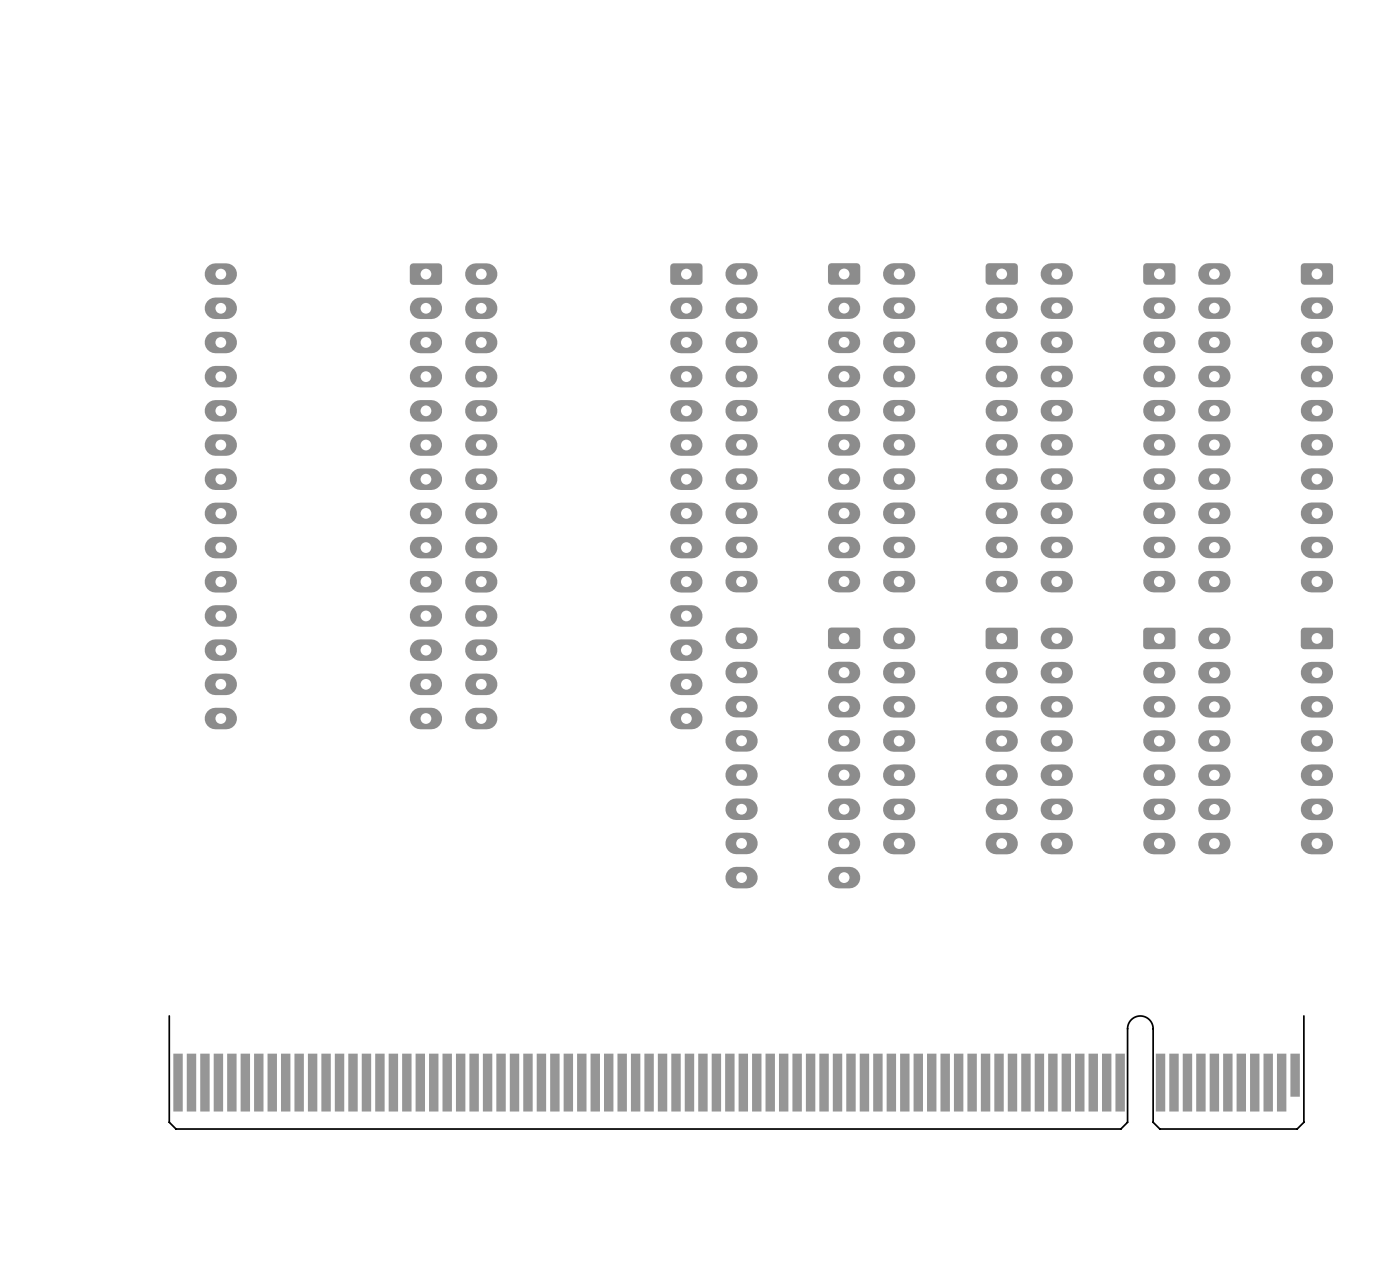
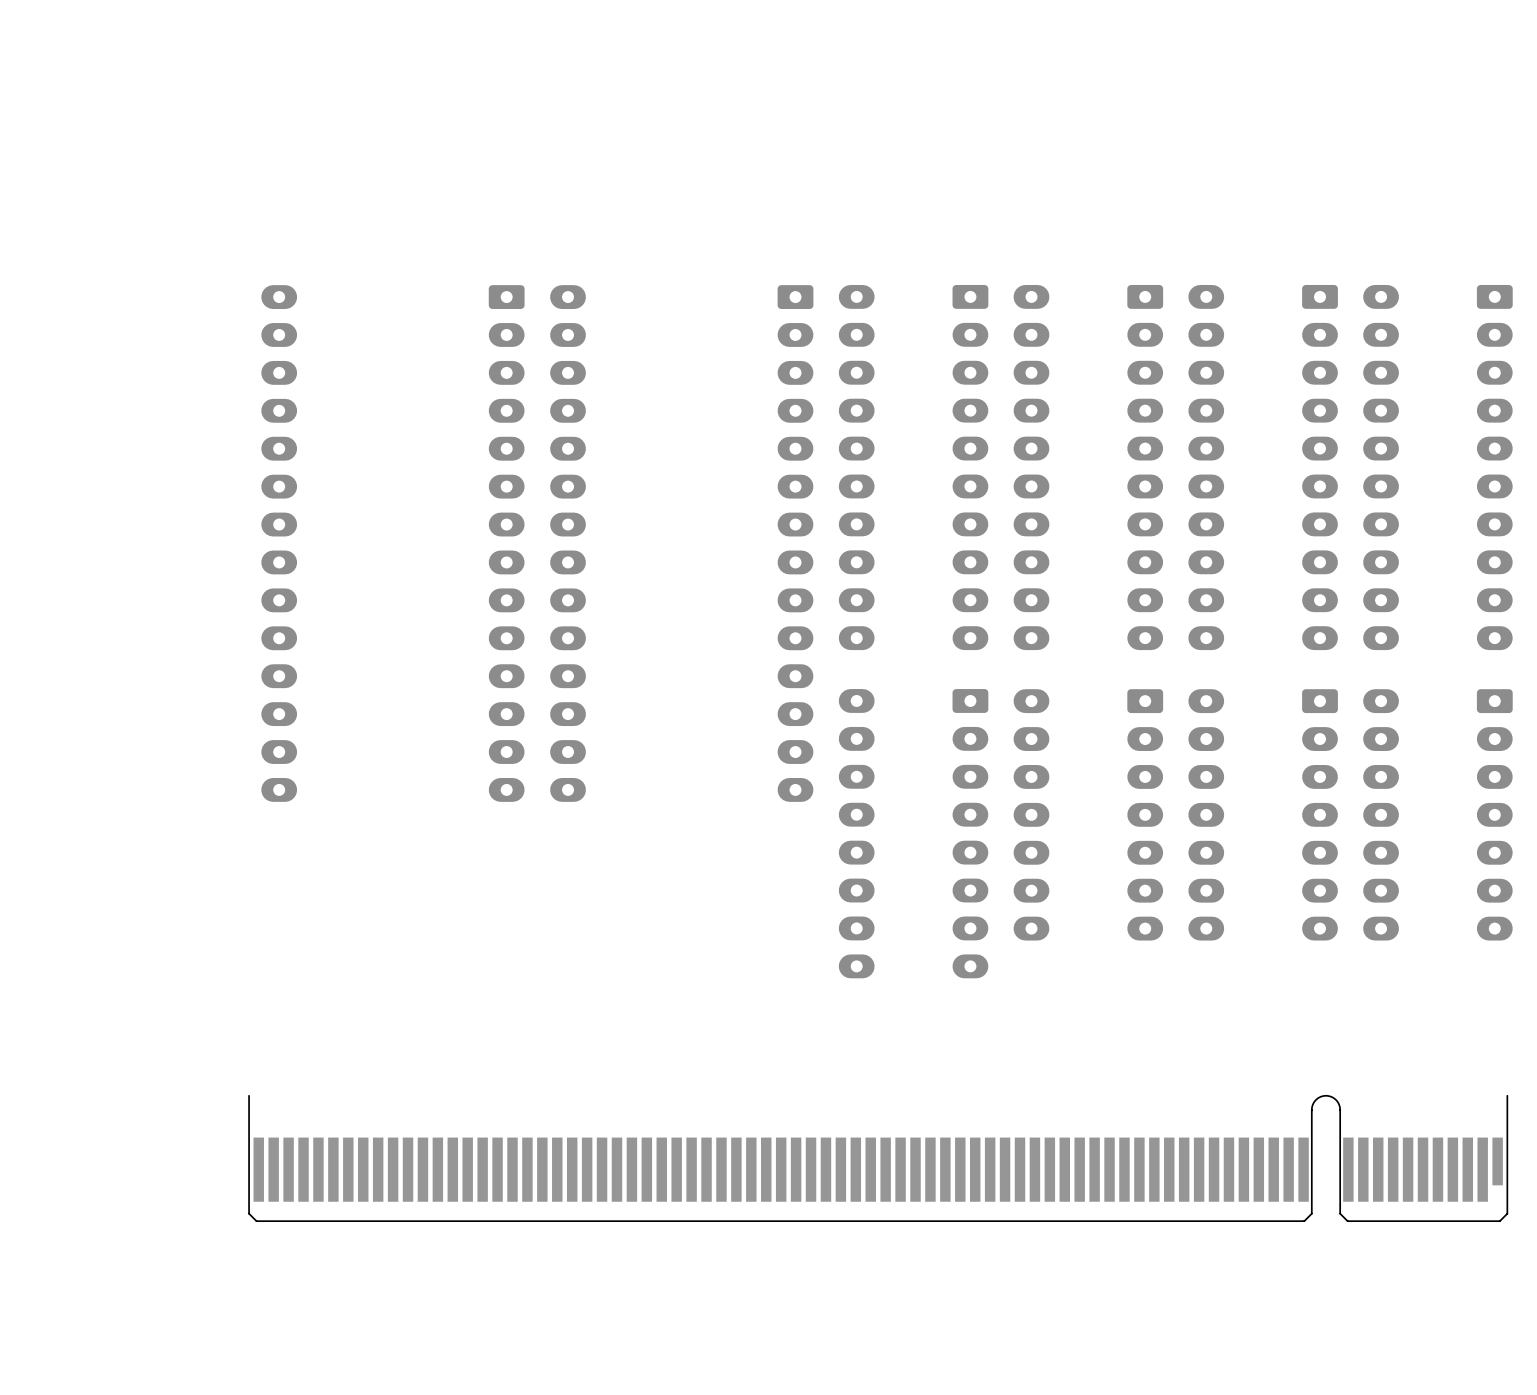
part position: (736, 1072) -> (878, 1158)

